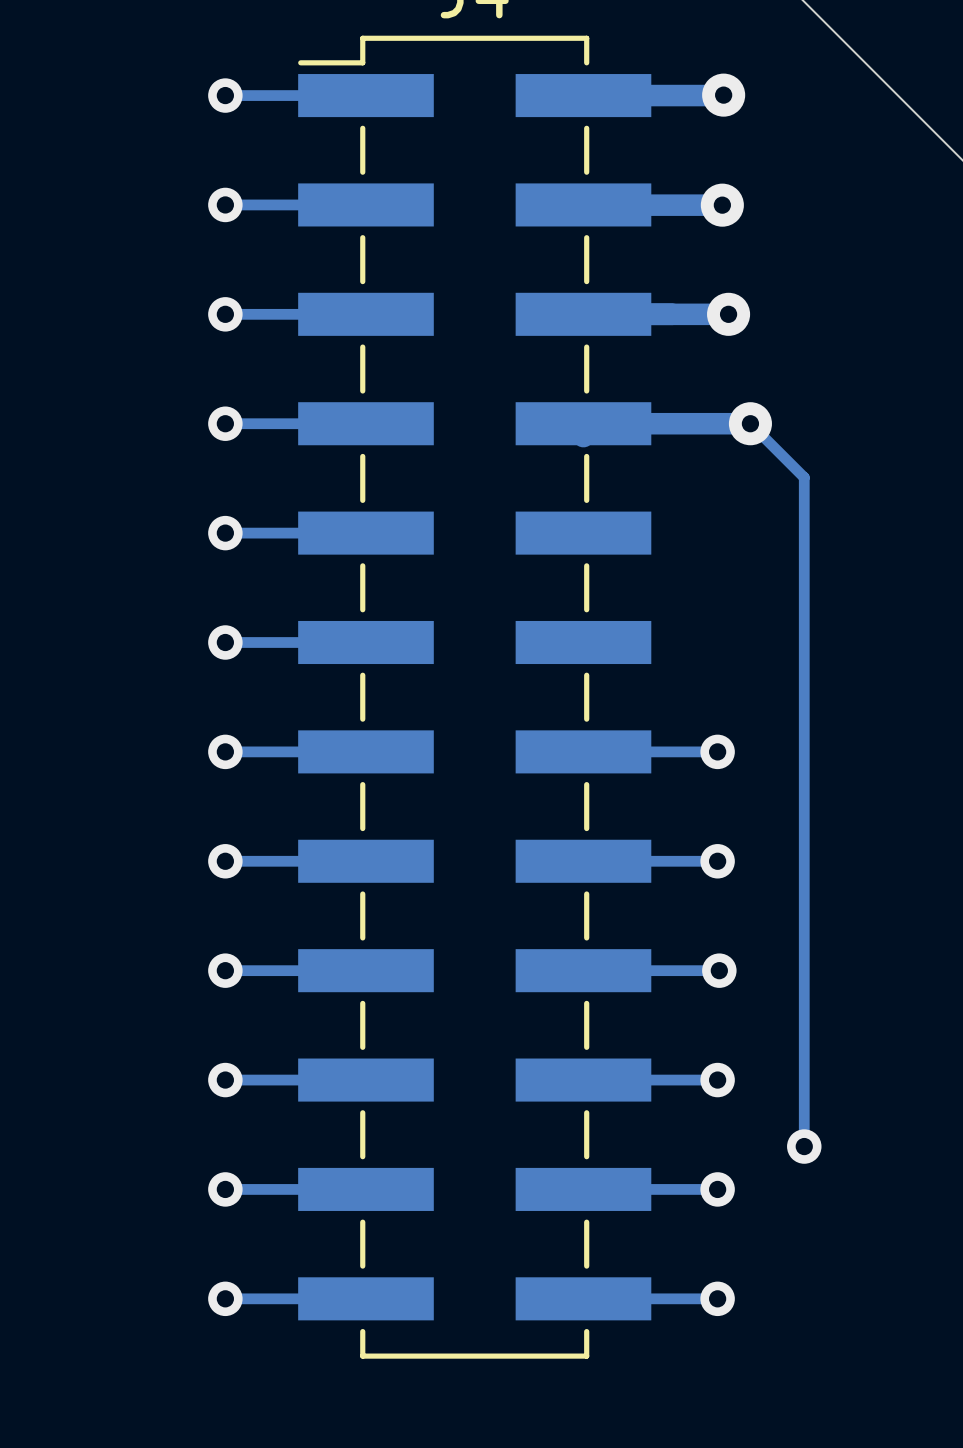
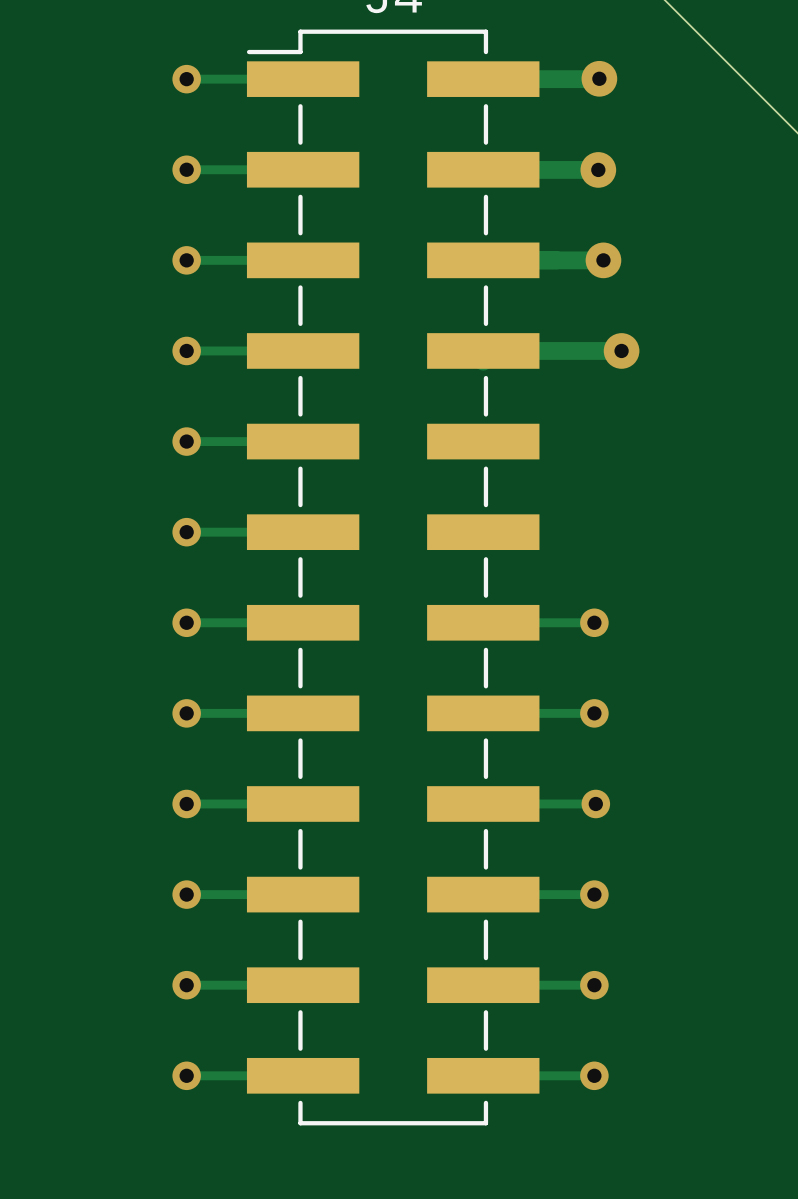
track: (750, 423) (804, 477) (804, 1146) -> none
via: (804, 1146) -> none

